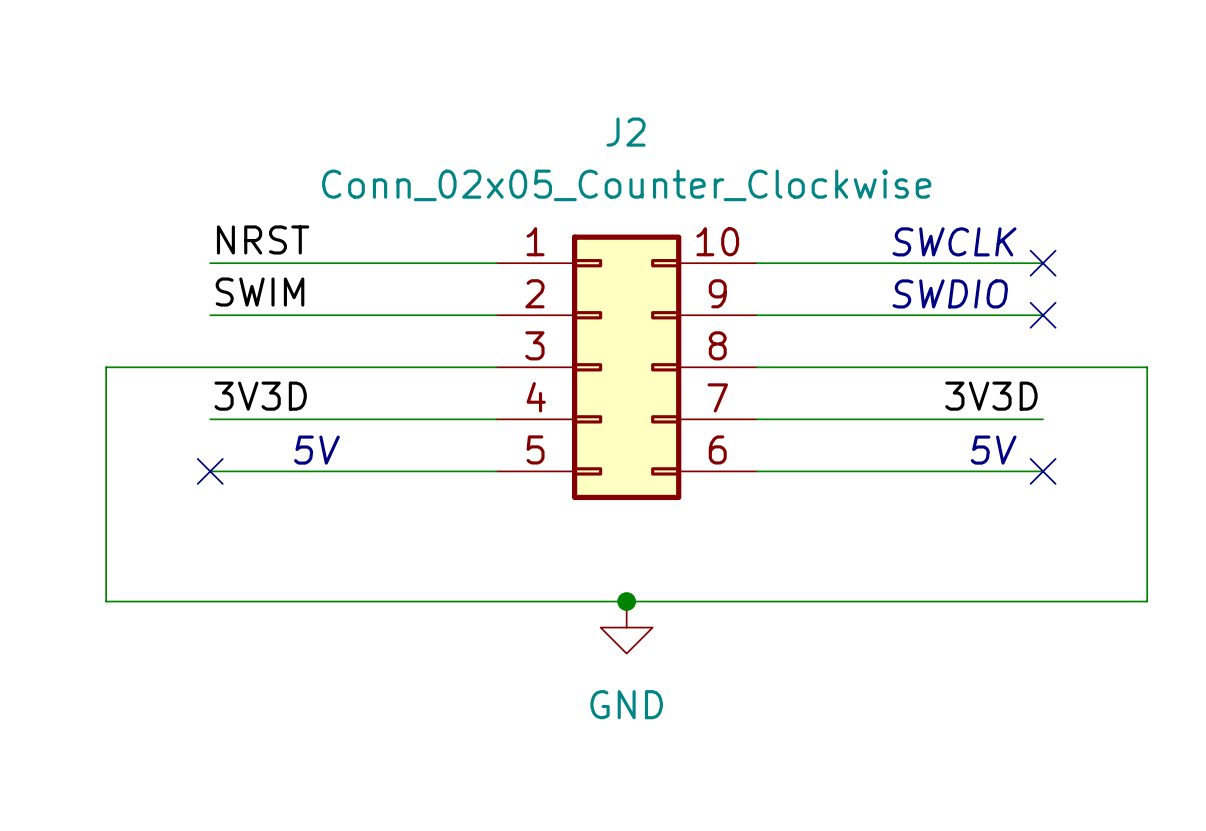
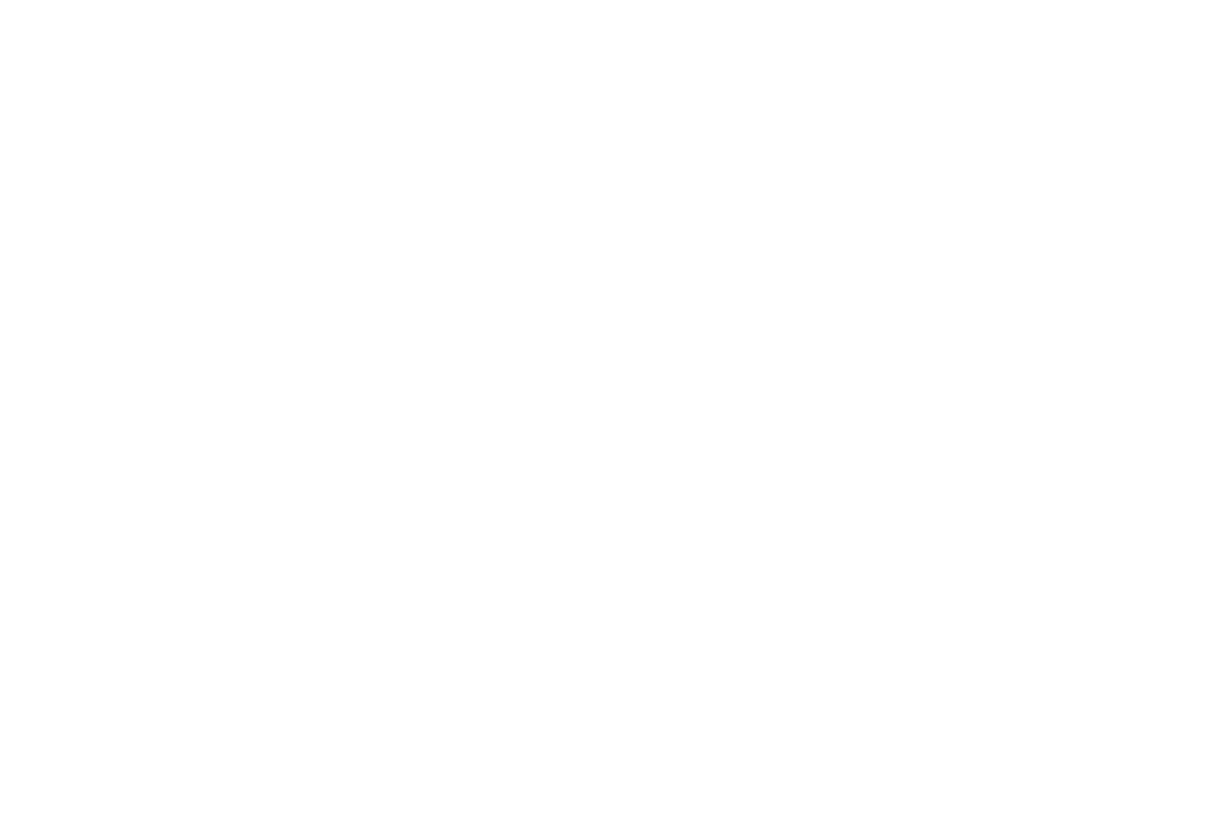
label: NRST (263, 239) -> none
text: SWCLK (954, 241) -> none
wire: (210, 263) (496, 263) -> none
wire: (756, 263) (1043, 263) -> none
no-connect mark: (1043, 263) -> none
label: SWIM (260, 292) -> none
text: SWDIO (950, 293) -> none
wire: (210, 315) (496, 315) -> none
wire: (756, 315) (1043, 315) -> none
no-connect mark: (1043, 315) -> none
wire: (496, 367) (106, 367) (106, 601) (1147, 601) (1147, 367) (756, 367) -> none
J2: Conn_02x05_Counter_Clockwise (626, 367) -> none
label: 3V3D (260, 396) -> none
label: 3V3D (991, 396) -> none
wire: (210, 419) (496, 419) -> none
wire: (756, 419) (1043, 419) -> none
text: 5V (316, 450) -> none
text: 5V (993, 450) -> none
wire: (210, 471) (496, 471) -> none
no-connect mark: (210, 471) -> none
wire: (756, 471) (1043, 471) -> none
no-connect mark: (1043, 471) -> none
junction: (626, 601) -> none
power symbol: GND (626, 627) -> none

